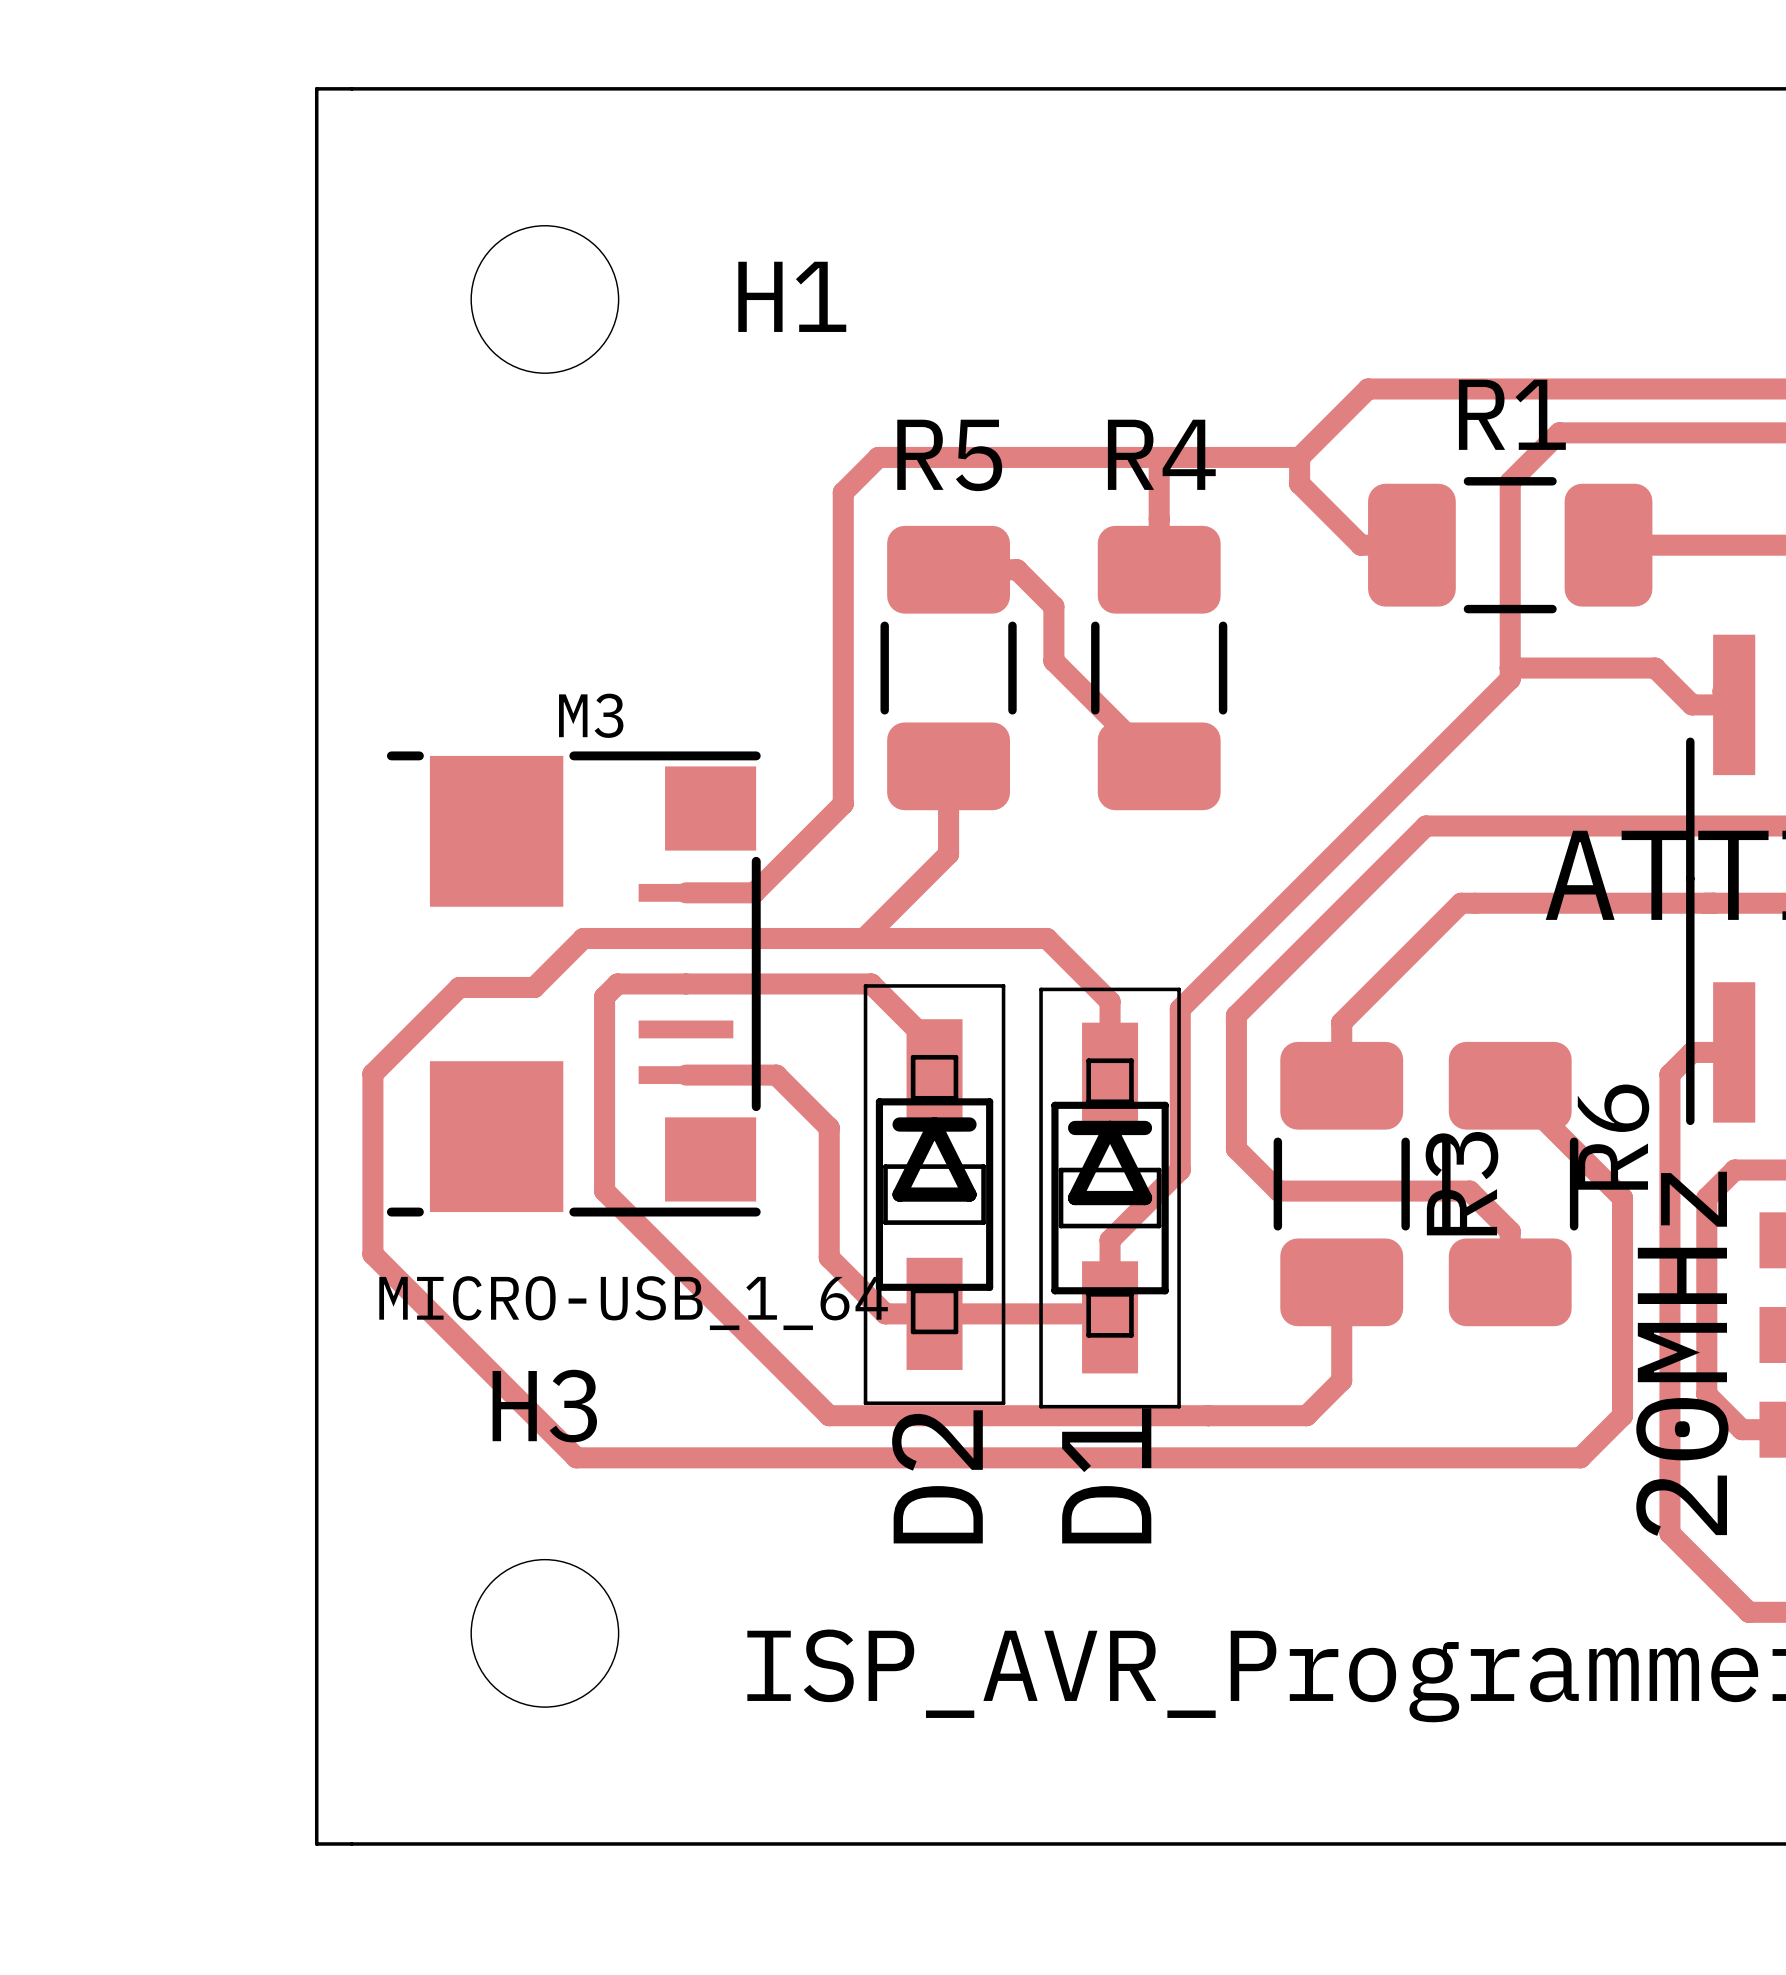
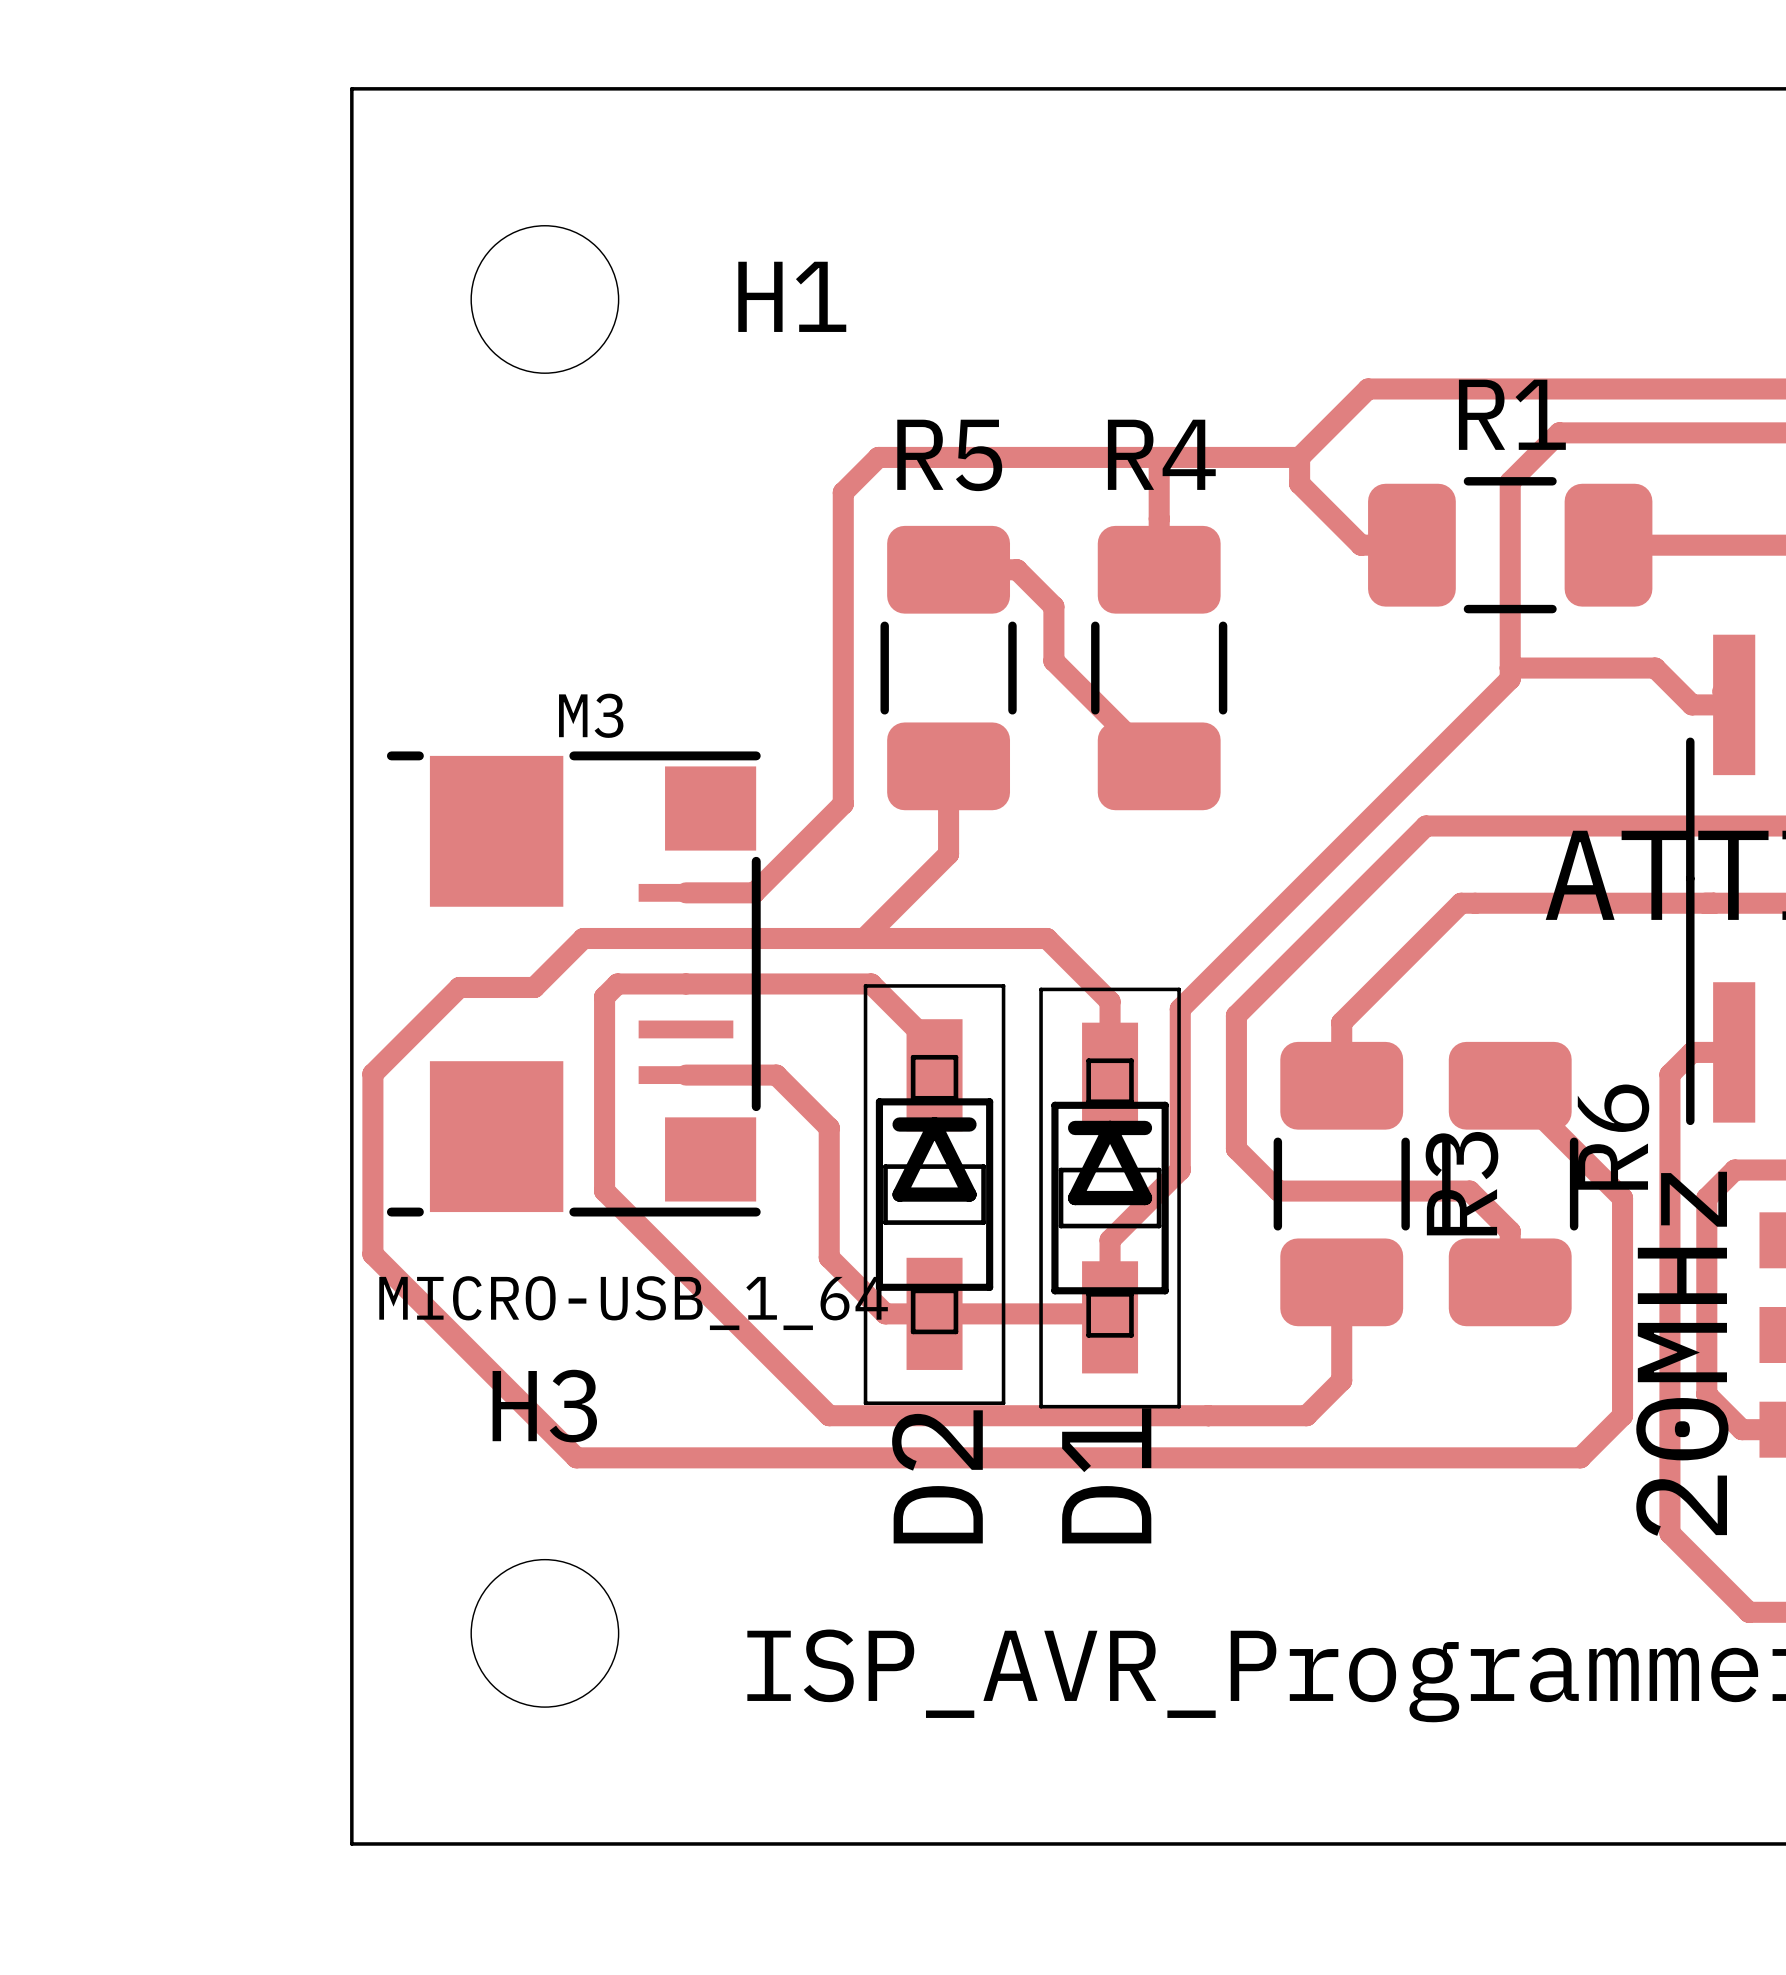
board edge: (351, 88) (316, 88) (316, 1843) (351, 1843) -> (351, 88) (351, 1843)

